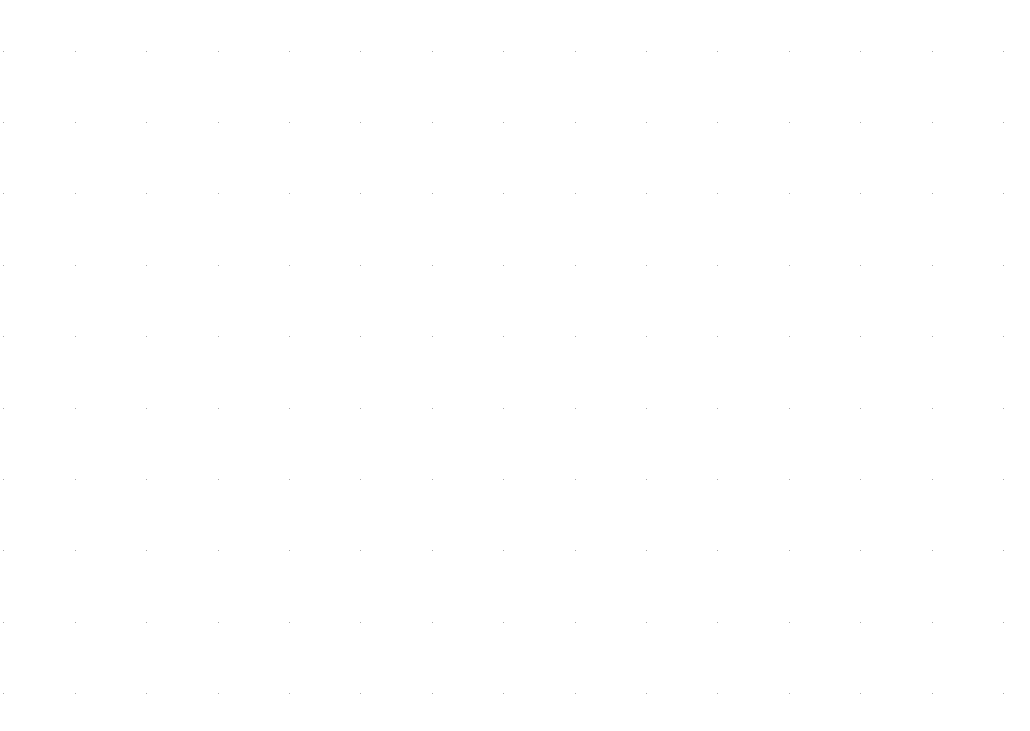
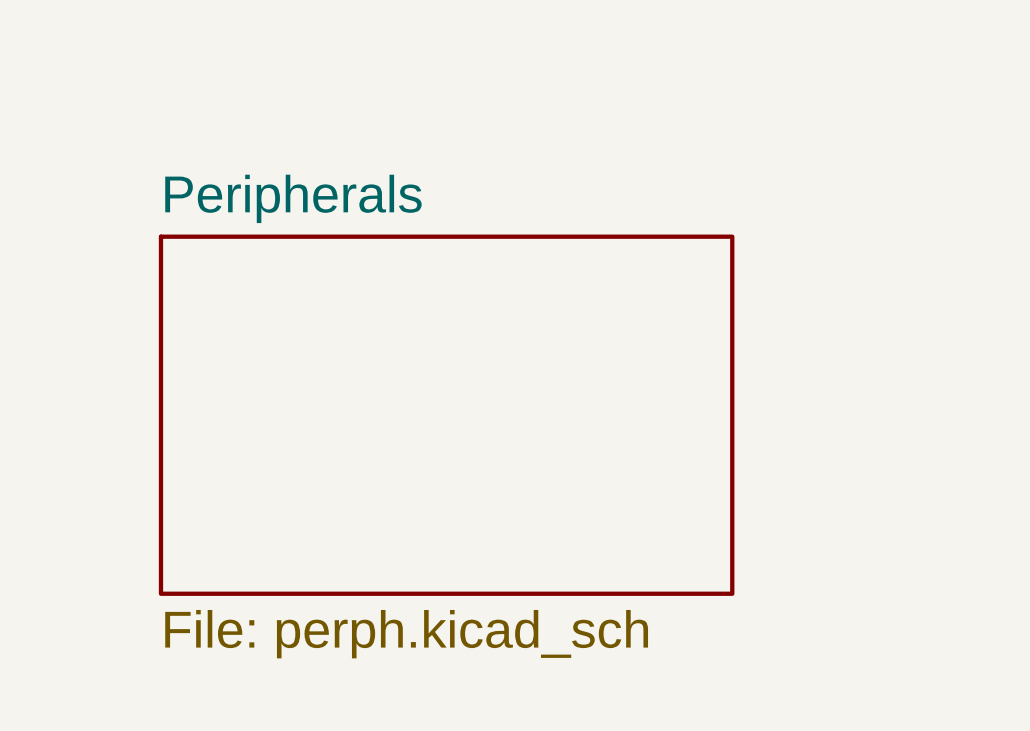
sheet Peripherals: none -> File: perph.kicad_sch (446, 415)

